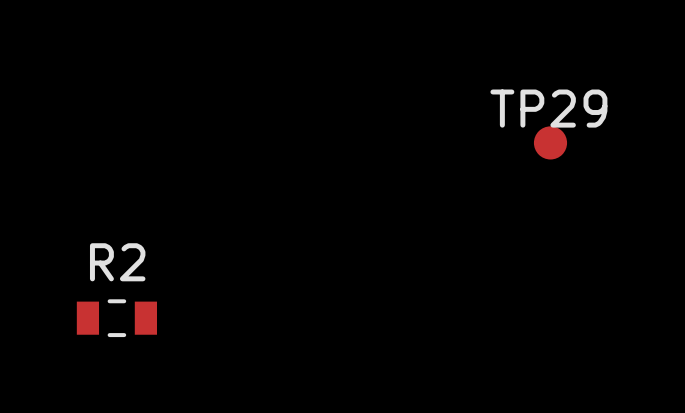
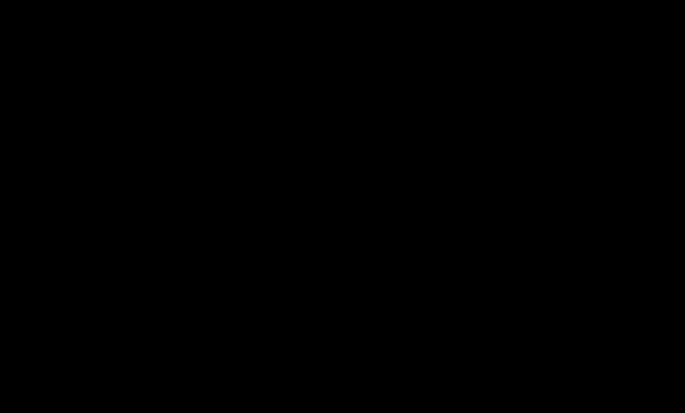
TP29: (550, 142) -> none
R2: (116, 318) -> none

